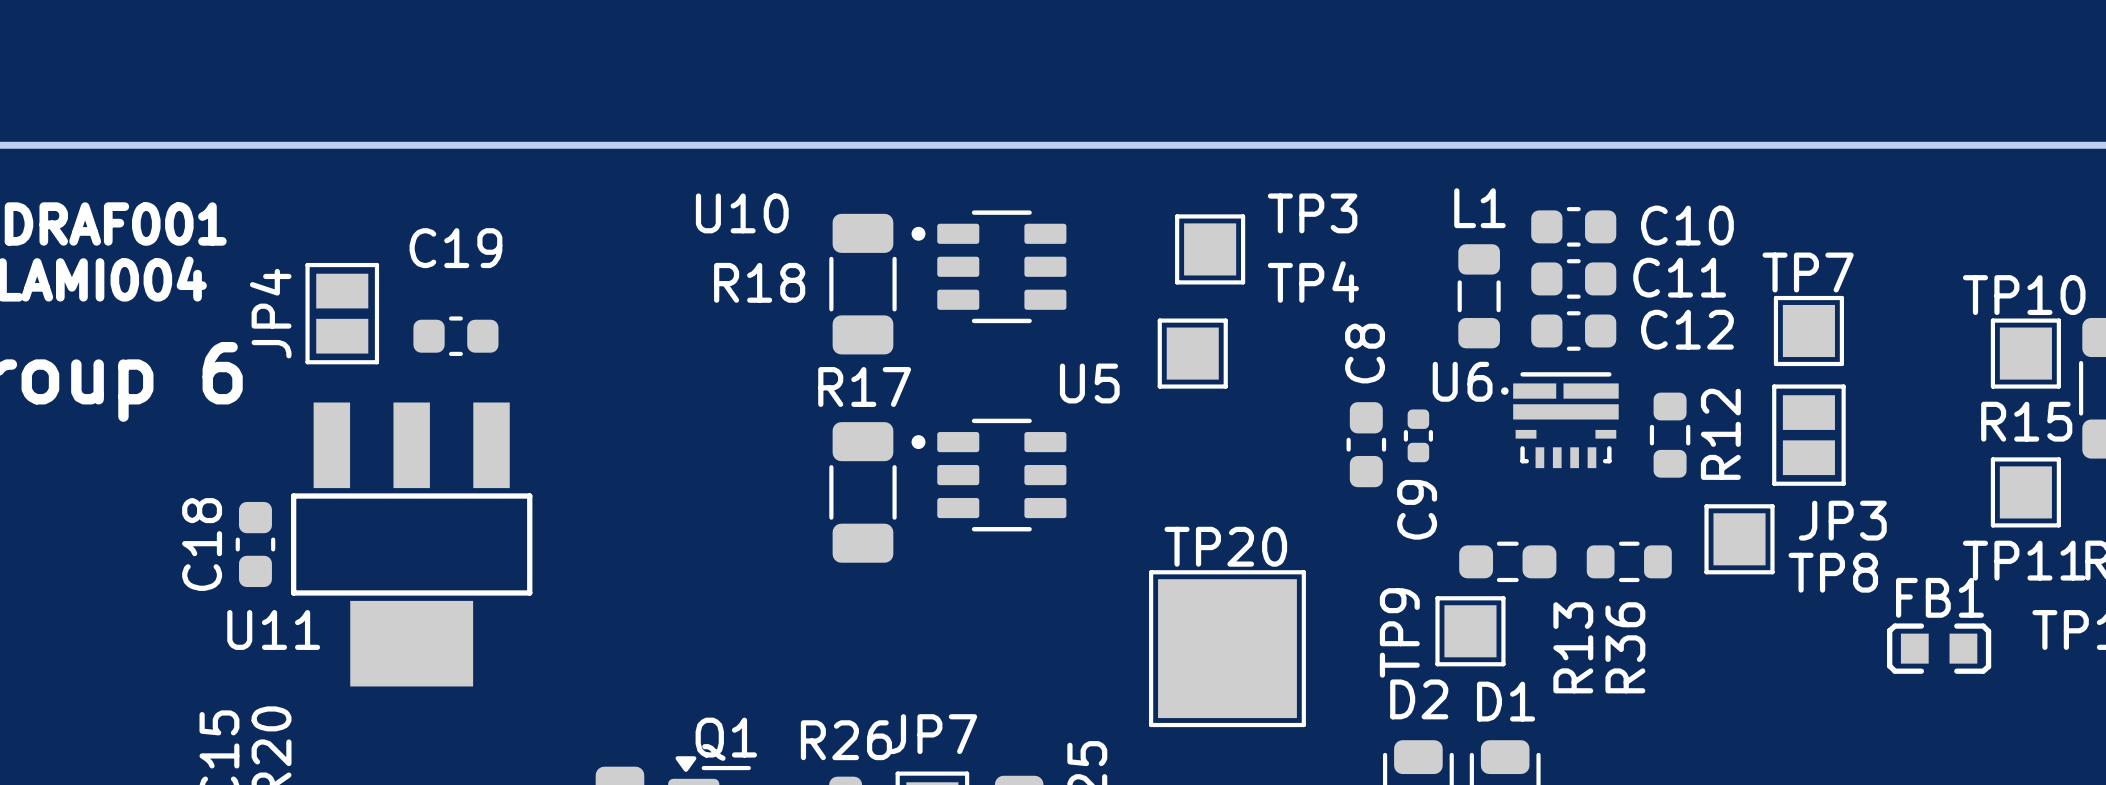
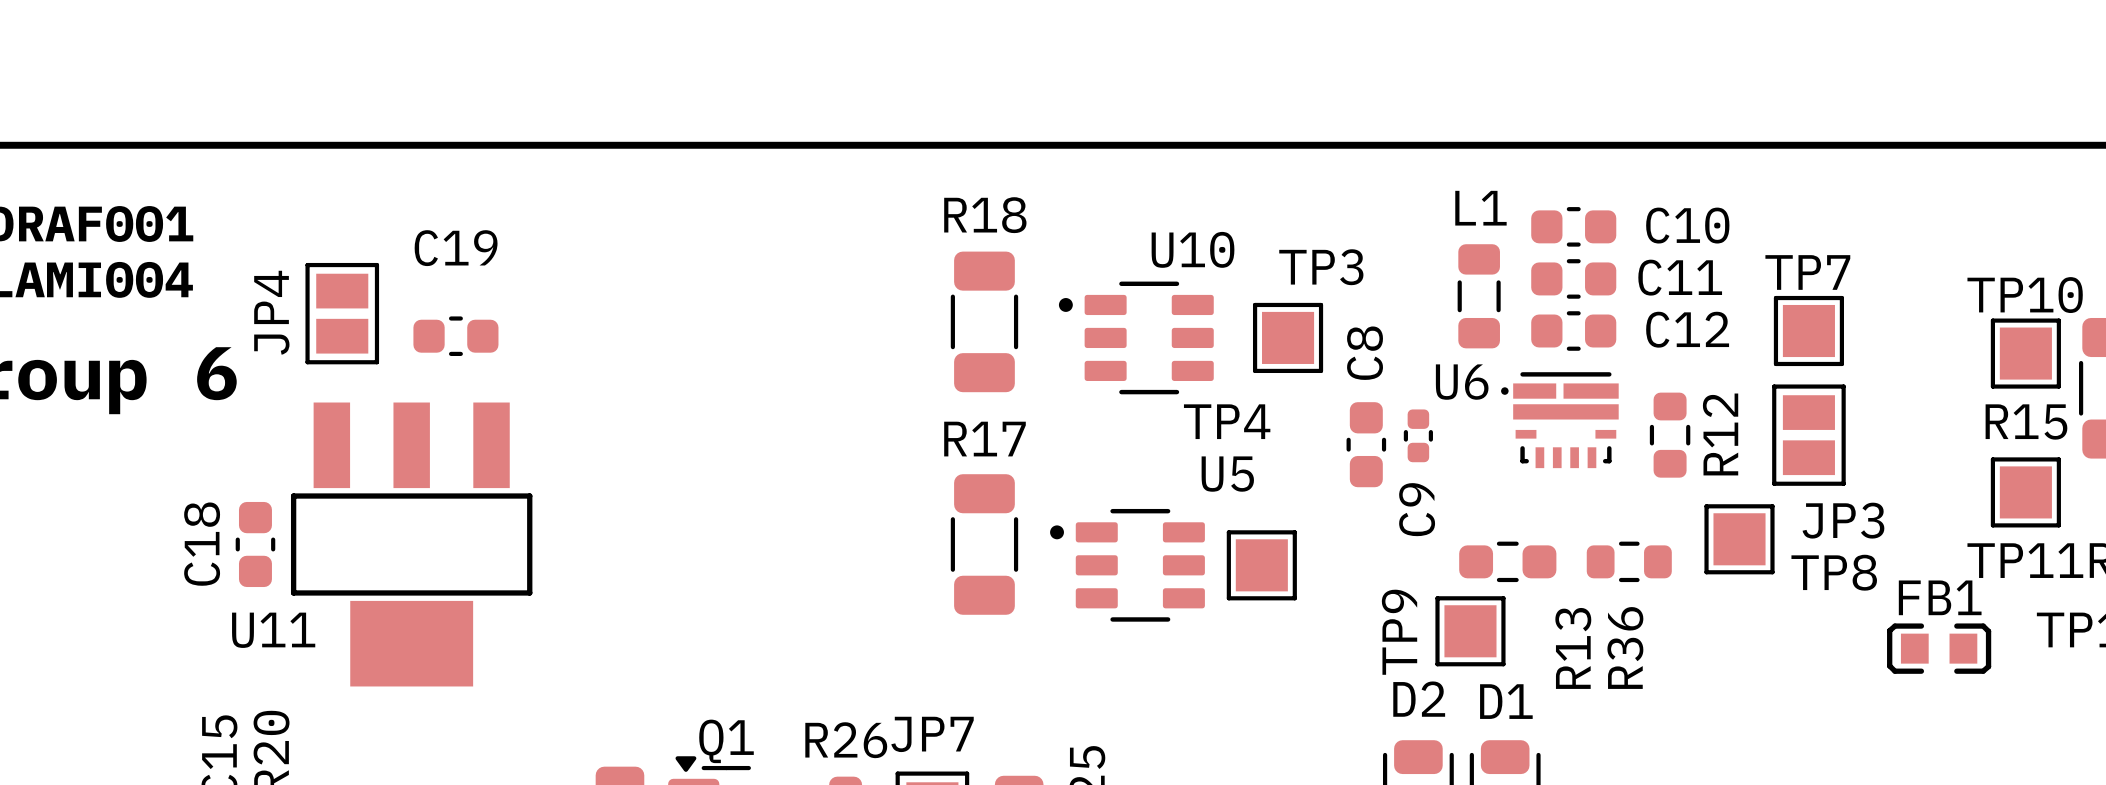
U10 name position: U10 (742, 213) -> U10 (1193, 249)
TP3 name position: TP3 (1312, 213) -> TP3 (1321, 267)
TP3 position: (1210, 249) -> (1288, 337)
U10 position: (988, 266) -> (1136, 337)
R18 name position: R18 (759, 282) -> R18 (985, 215)
TP4 name position: TP4 (1313, 282) -> TP4 (1227, 421)
R18 position: (862, 284) -> (984, 321)
TP4 position: (1192, 353) -> (1261, 565)
U5 position: (988, 475) -> (1127, 565)
R17 position: (862, 492) -> (984, 544)
TP20: (1227, 648) -> none

